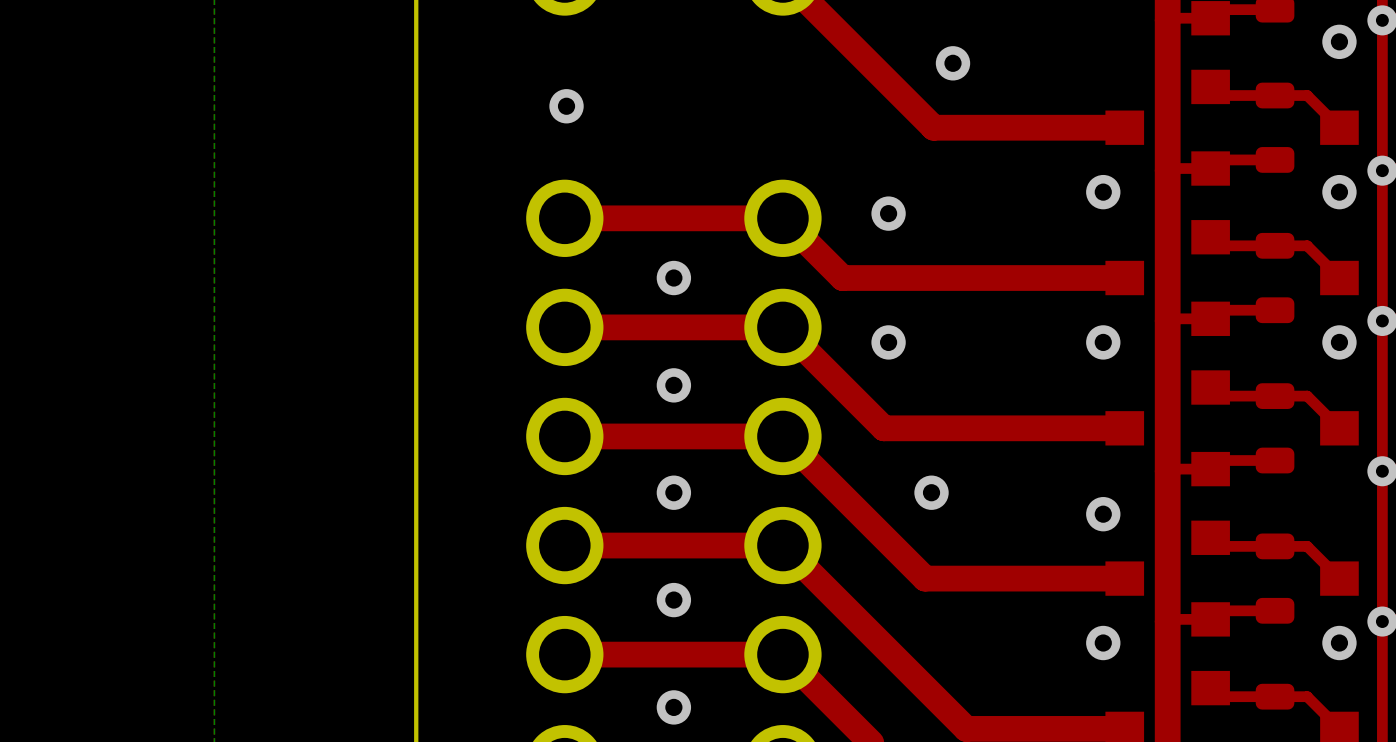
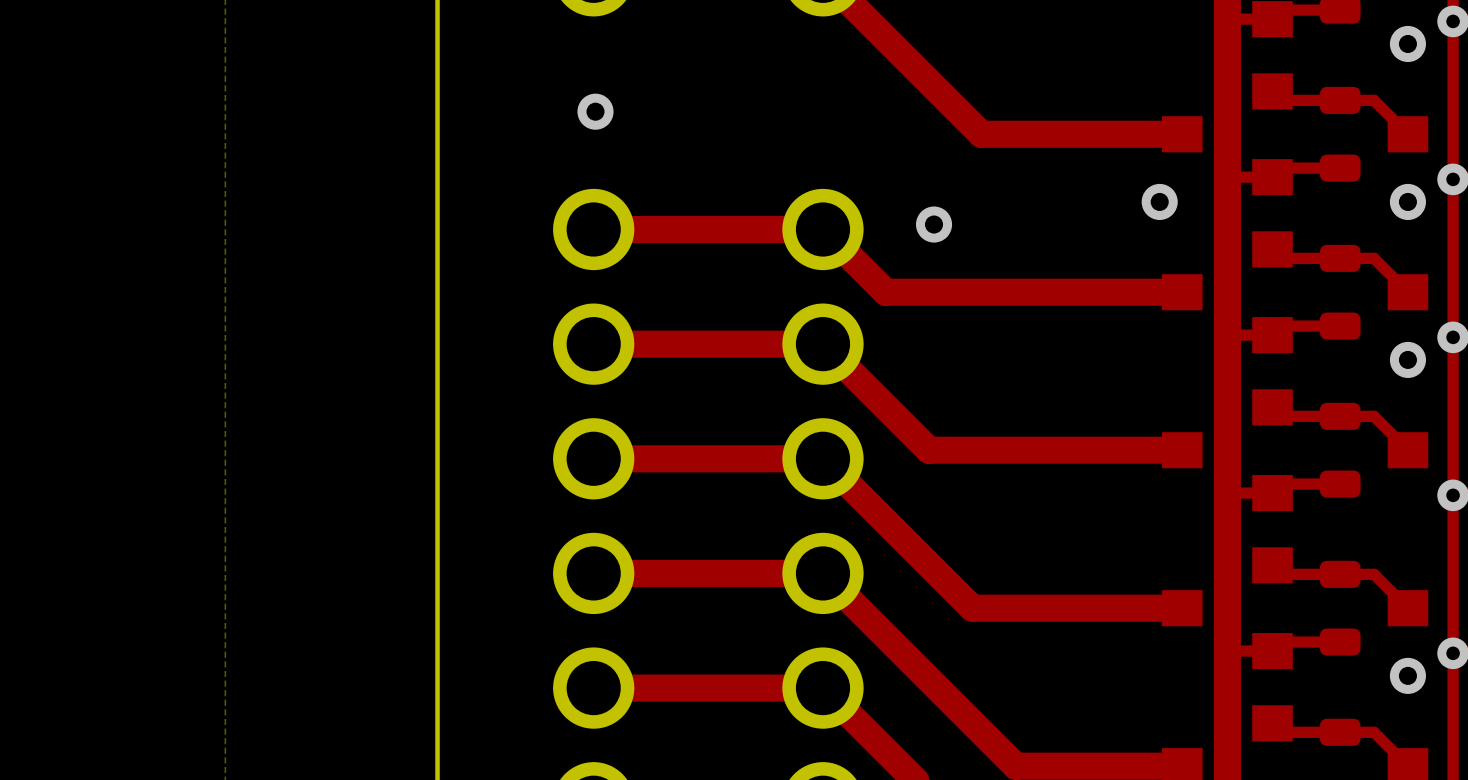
via: (952, 63) -> none
via: (673, 278) -> none
via: (888, 342) -> none
via: (1103, 342) -> none
via: (673, 385) -> none
via: (673, 492) -> none
via: (931, 492) -> none
via: (1103, 514) -> none
via: (673, 600) -> none
via: (1103, 643) -> none
via: (673, 707) -> none

